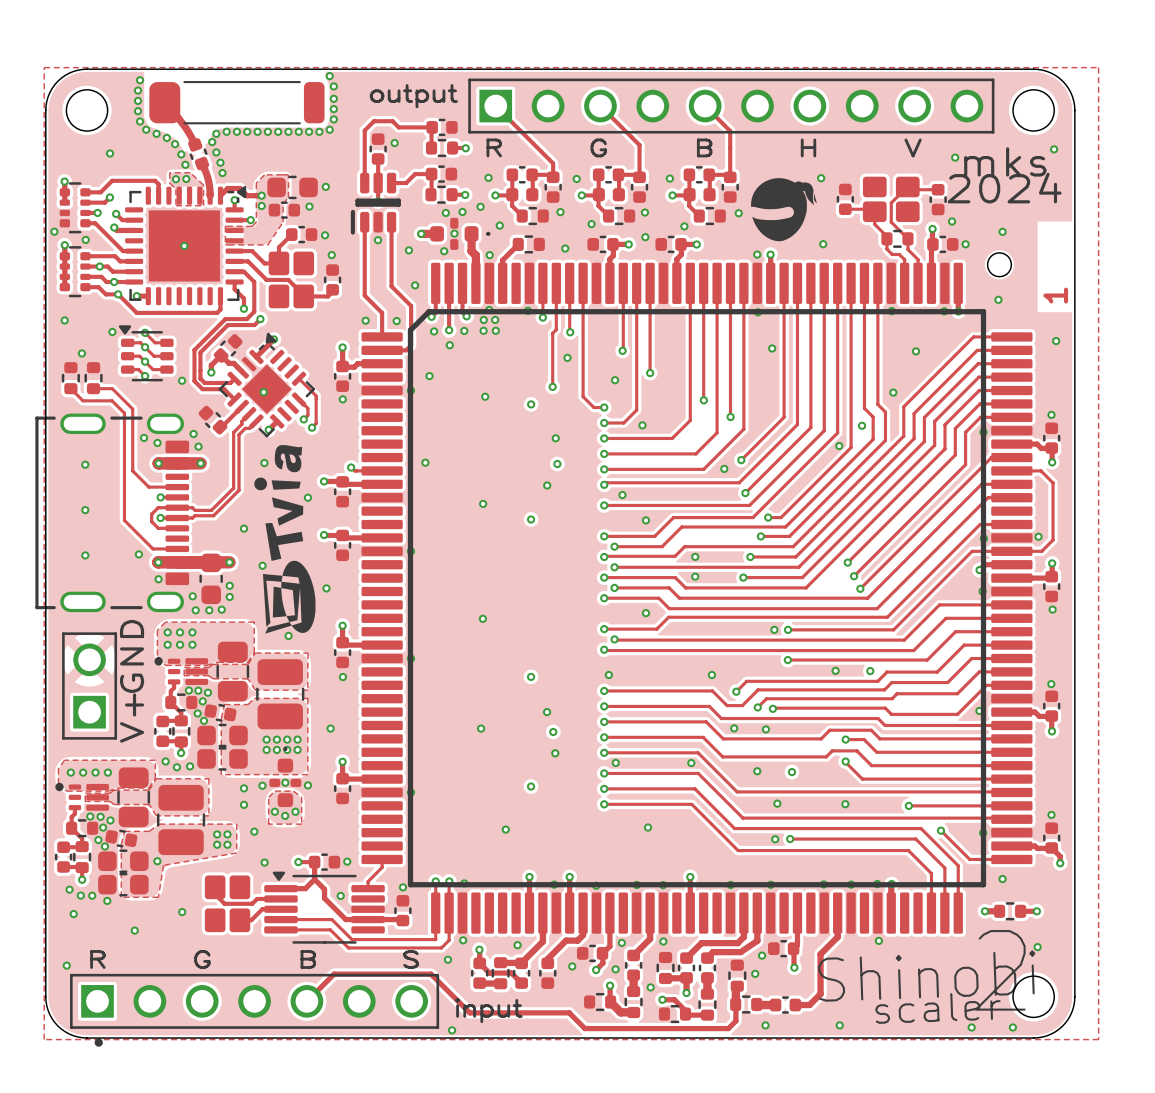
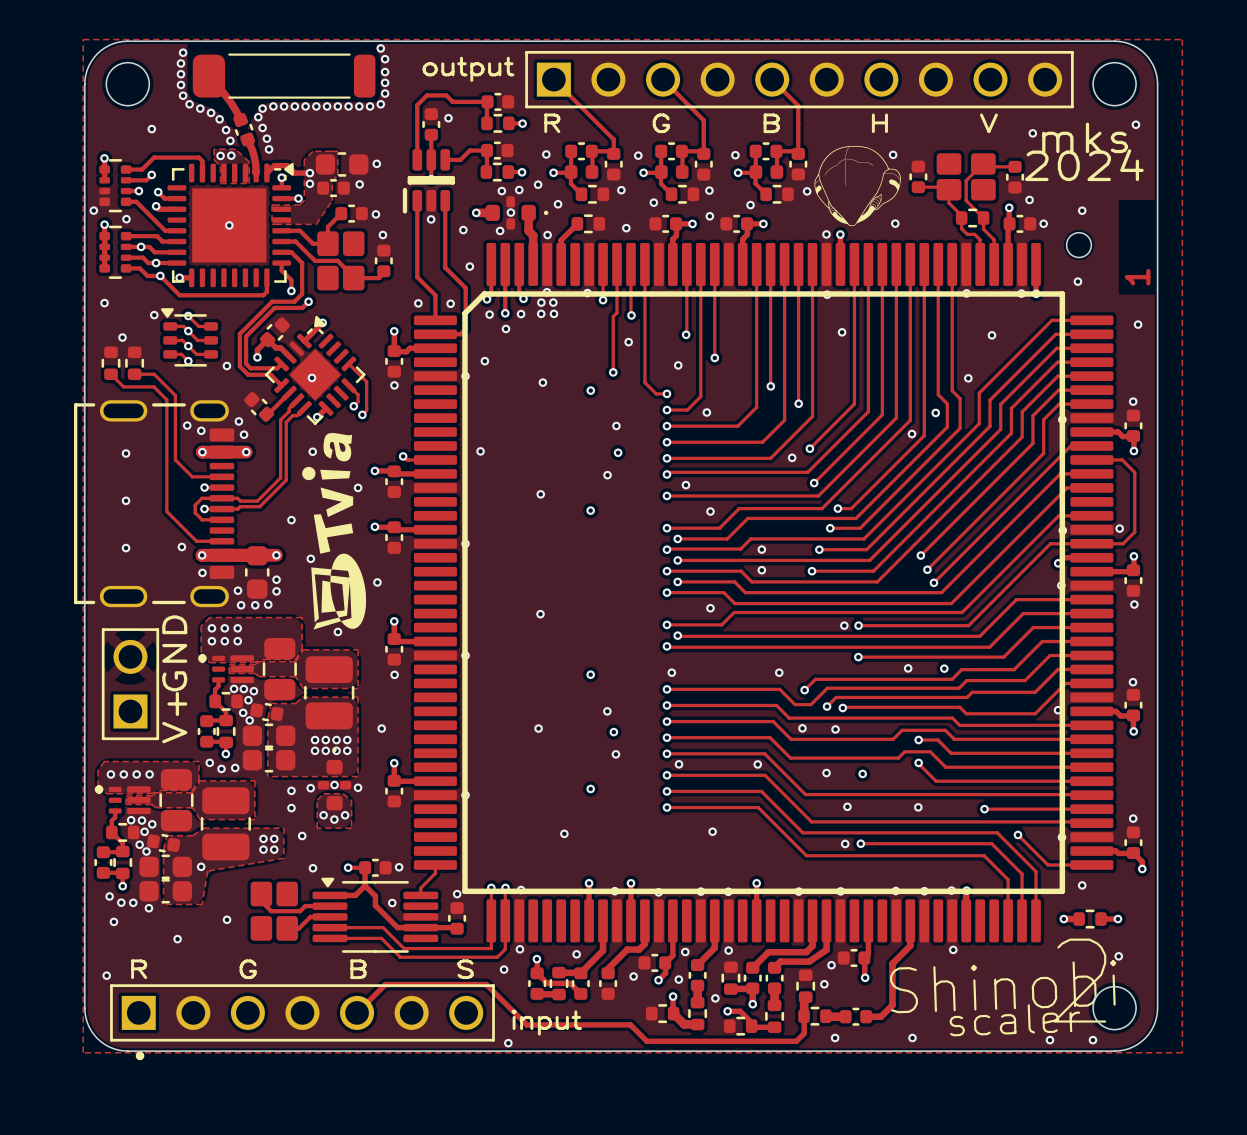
drawing shape: [751, 178, 815, 242] -> [814, 145, 901, 227]
drawing: [813, 193, 817, 204] -> none

